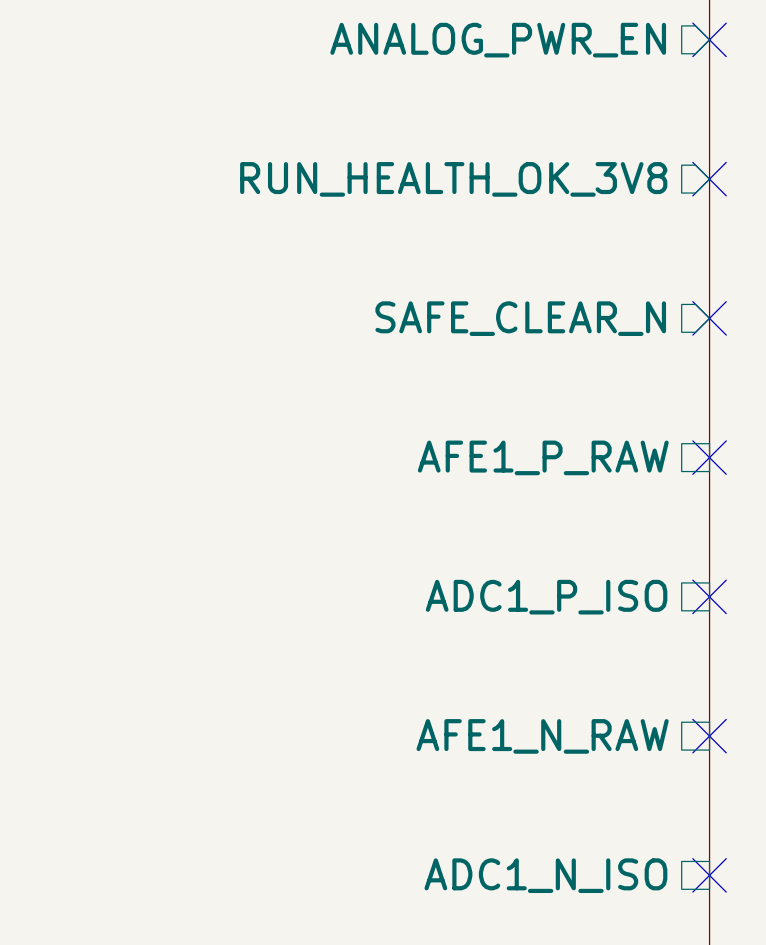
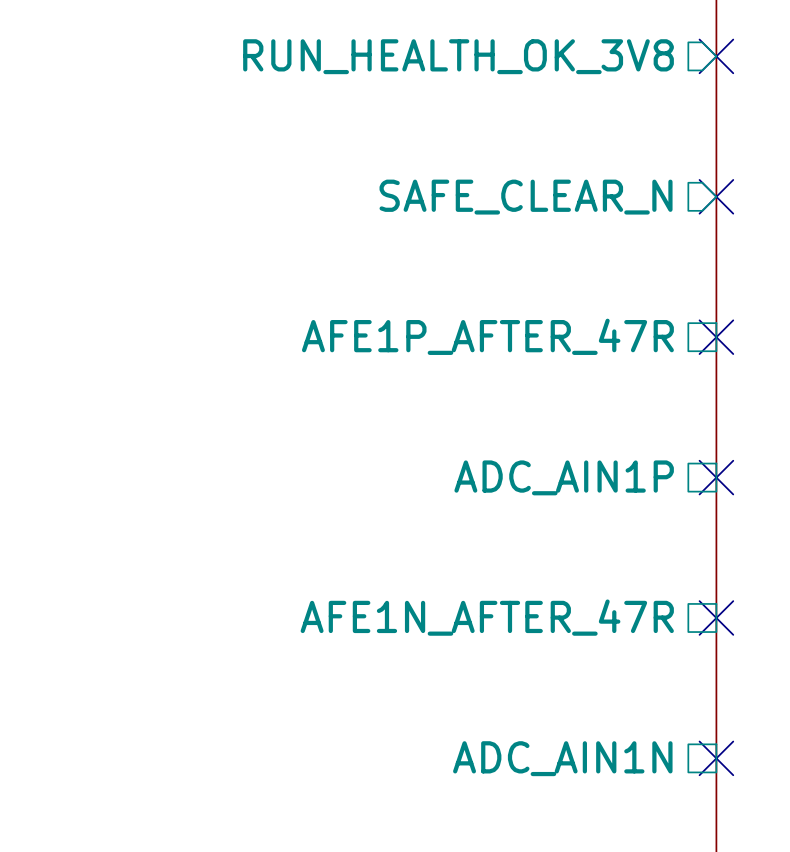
sheet pin: AFE1_P_RAW (543, 457) -> AFE1P_AFTER_47R (487, 336)
sheet pin: ADC1_P_ISO (546, 597) -> ADC_AIN1P (564, 477)
sheet pin: AFE1_N_RAW (542, 736) -> AFE1N_AFTER_47R (487, 617)
sheet pin: ADC1_N_ISO (545, 875) -> ADC_AIN1N (562, 758)

